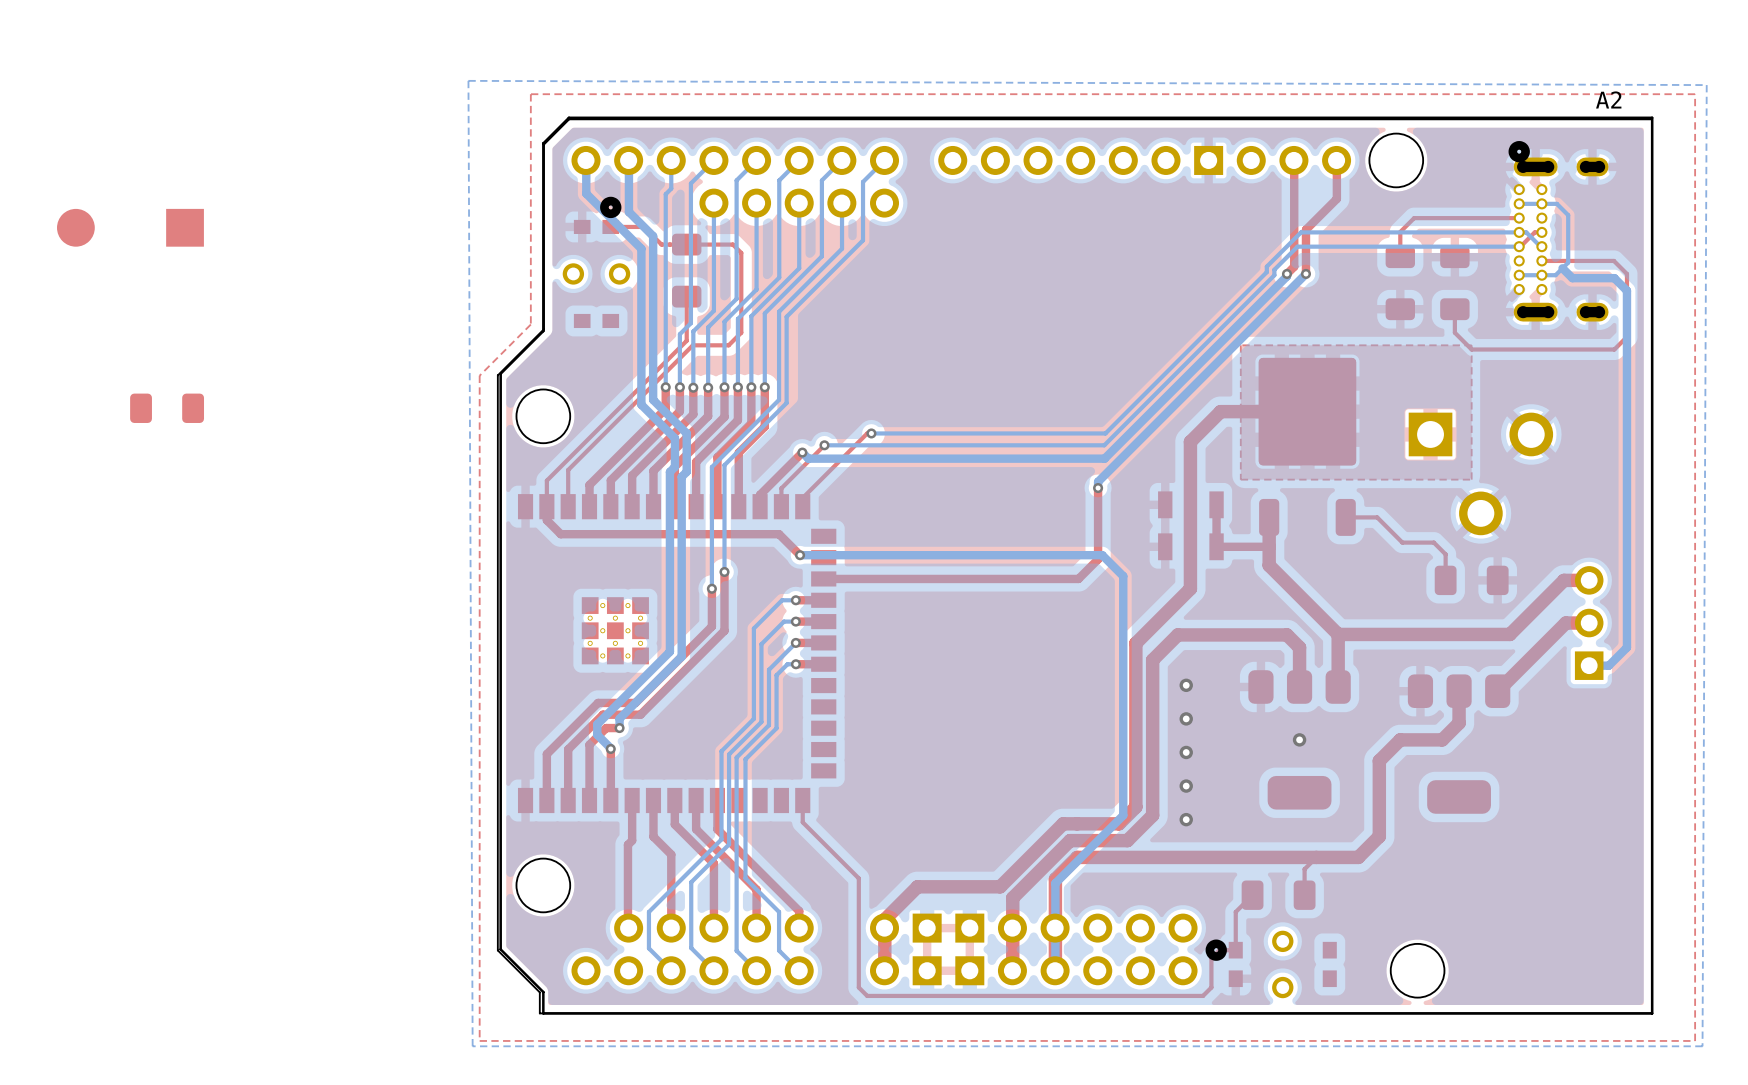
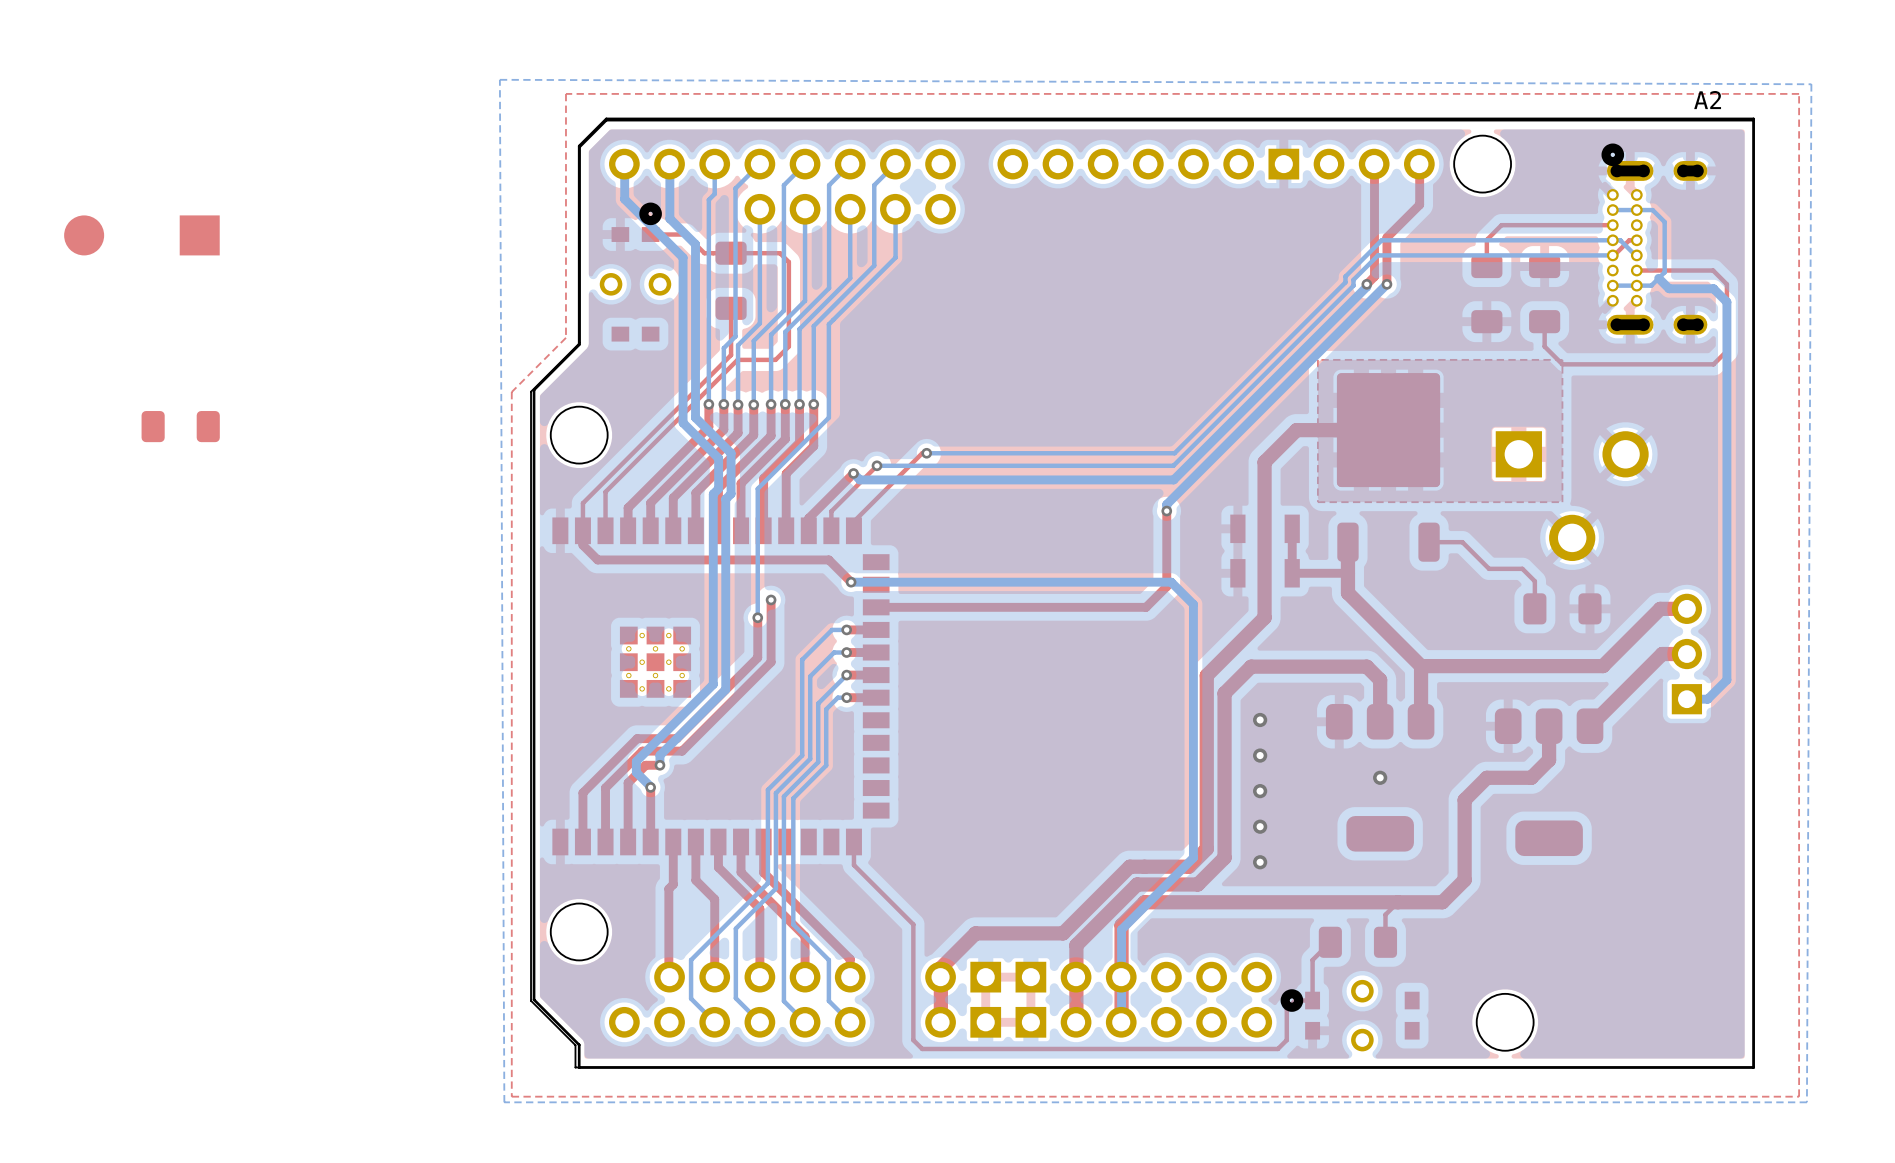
bottom track: (884, 160) (863, 181) (863, 240) (786, 316) (786, 403) (724, 465) (724, 571) -> none

